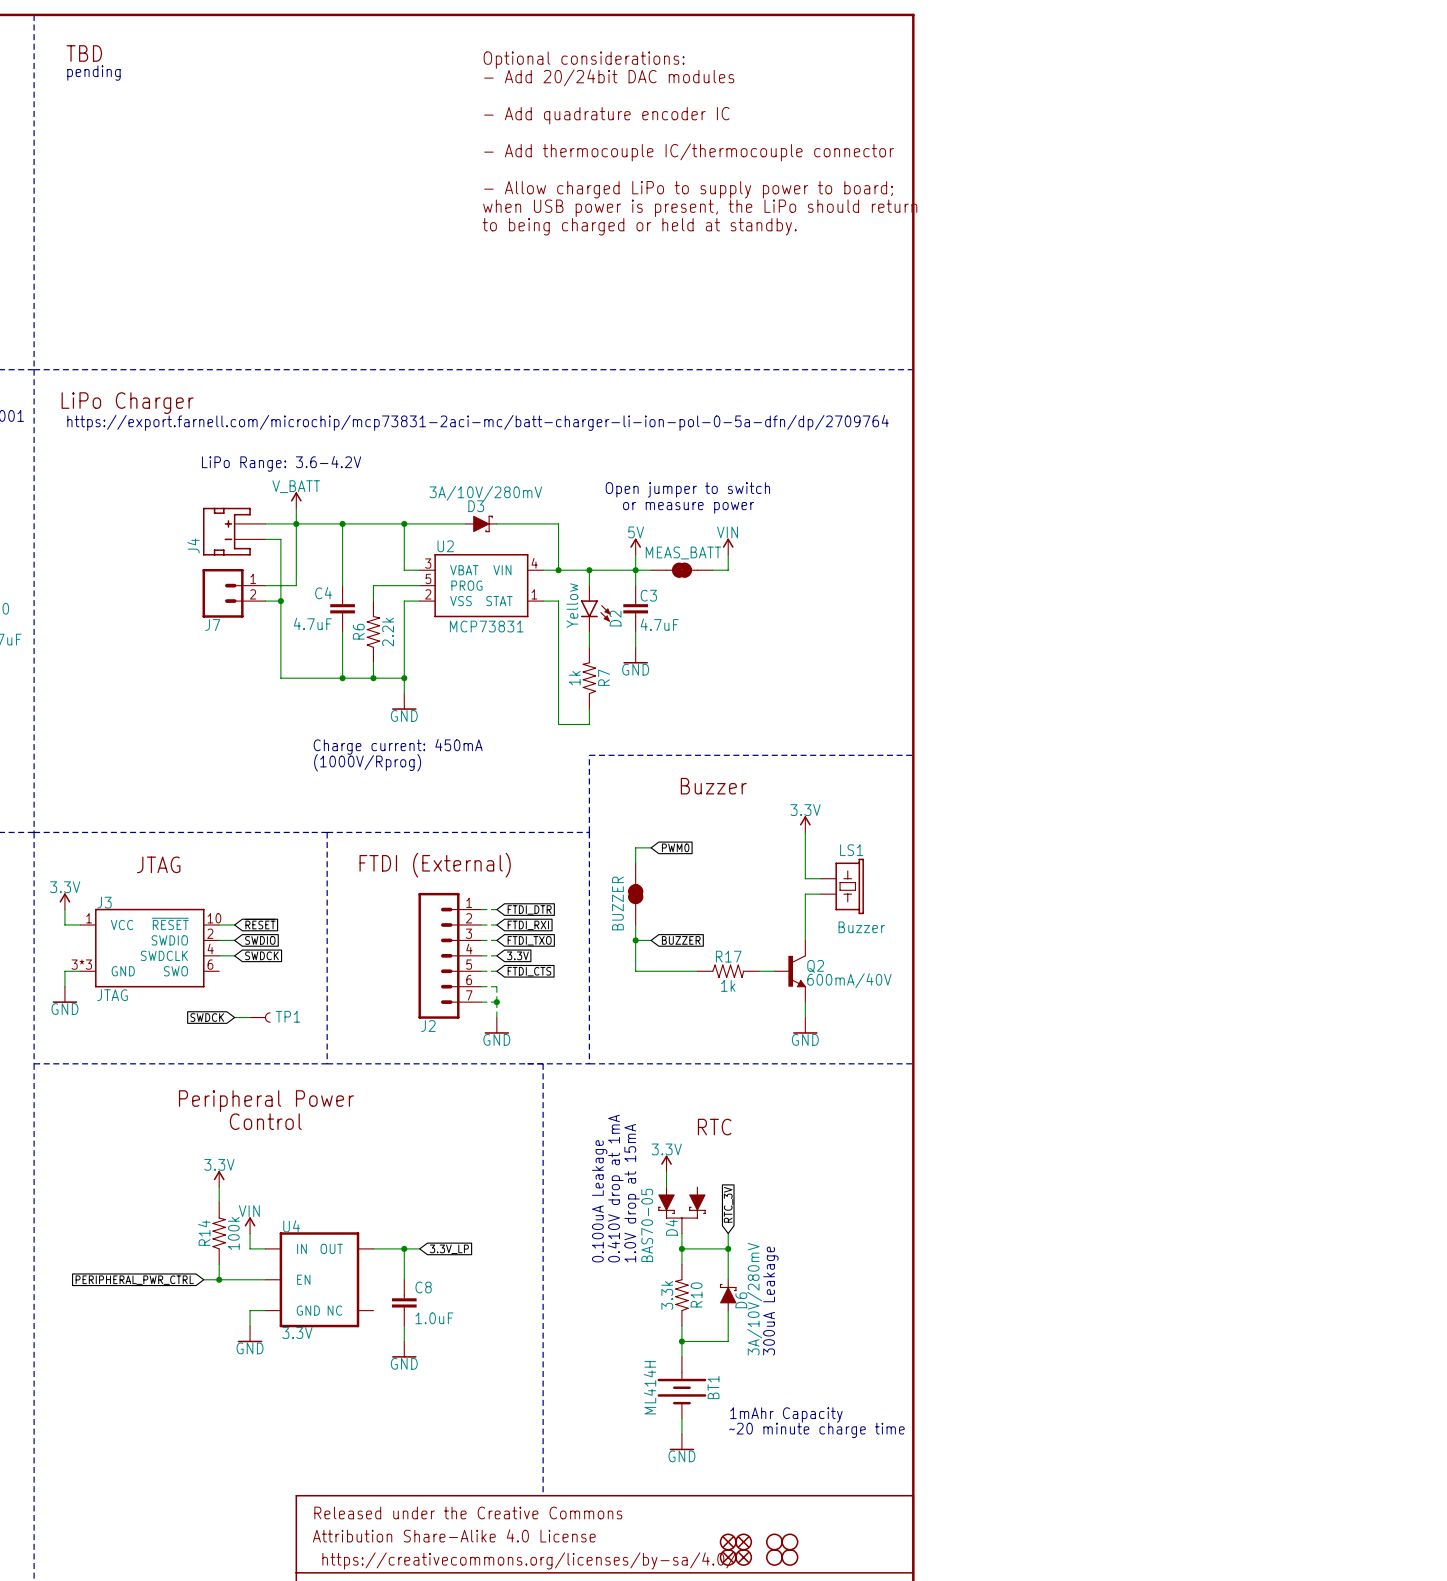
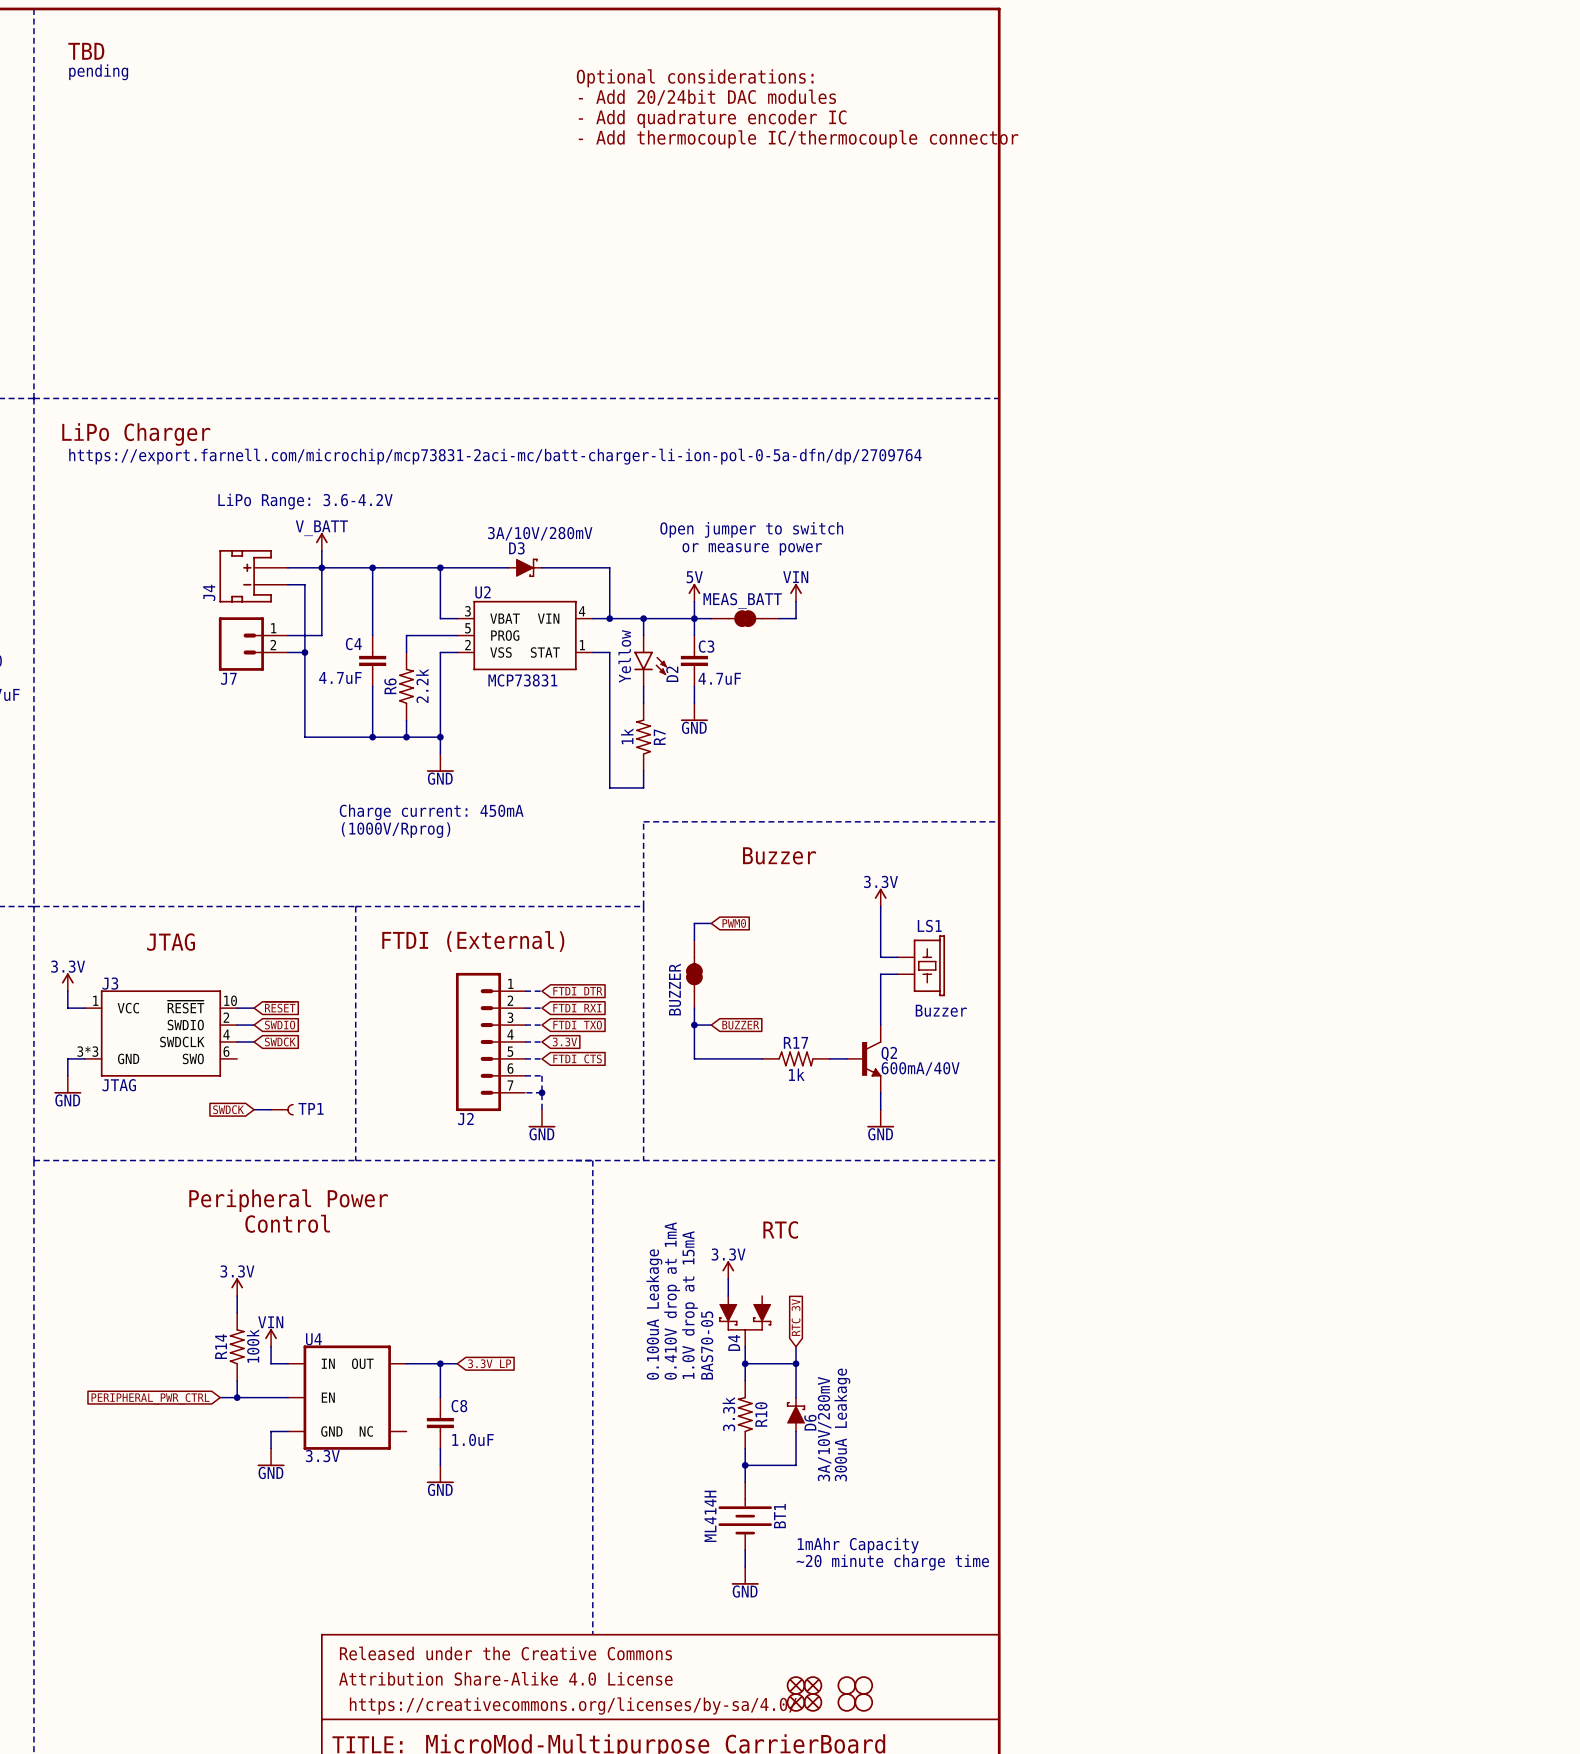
text position: Optional considerations: (584, 60) -> Optional considerations: (695, 78)
text position: - Add 20/24bit DAC modules (609, 77) -> - Add 20/24bit DAC modules (707, 97)
text position: - Add quadrature encoder IC (606, 115) -> - Add quadrature encoder IC (712, 119)
text position: - Add thermocouple IC/thermocouple connector (689, 152) -> - Add thermocouple IC/thermocouple connector (798, 139)
text: - Allow charged LiPo to supply power to board; (688, 189) -> none
text: when USB power is present, the LiPo should return (700, 208) -> none
text: to being charged or held at standby. (639, 226) -> none

